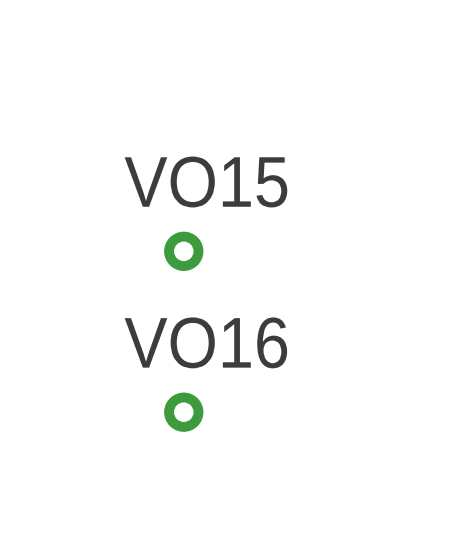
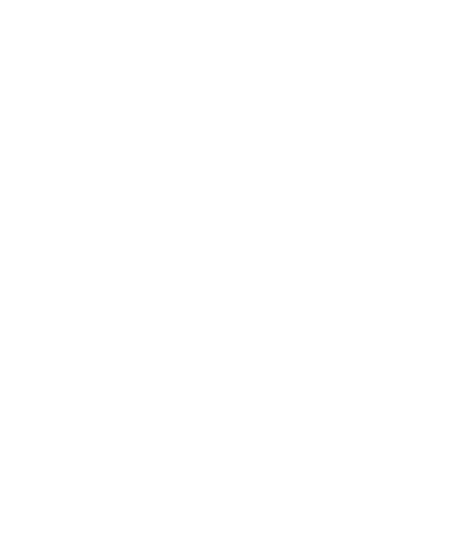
VO15: (183, 251) -> none
VO16: (183, 412) -> none

